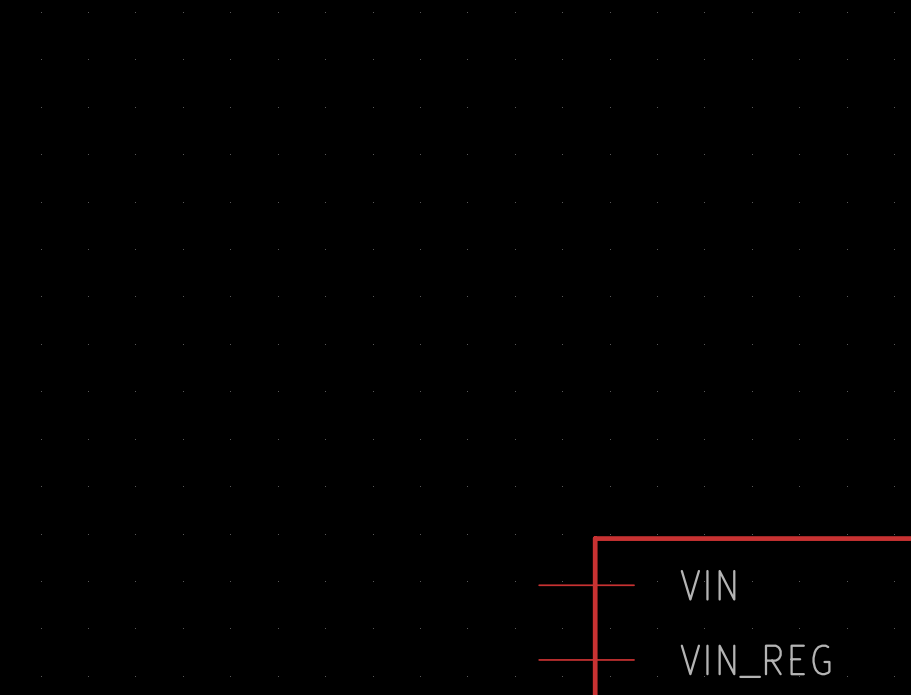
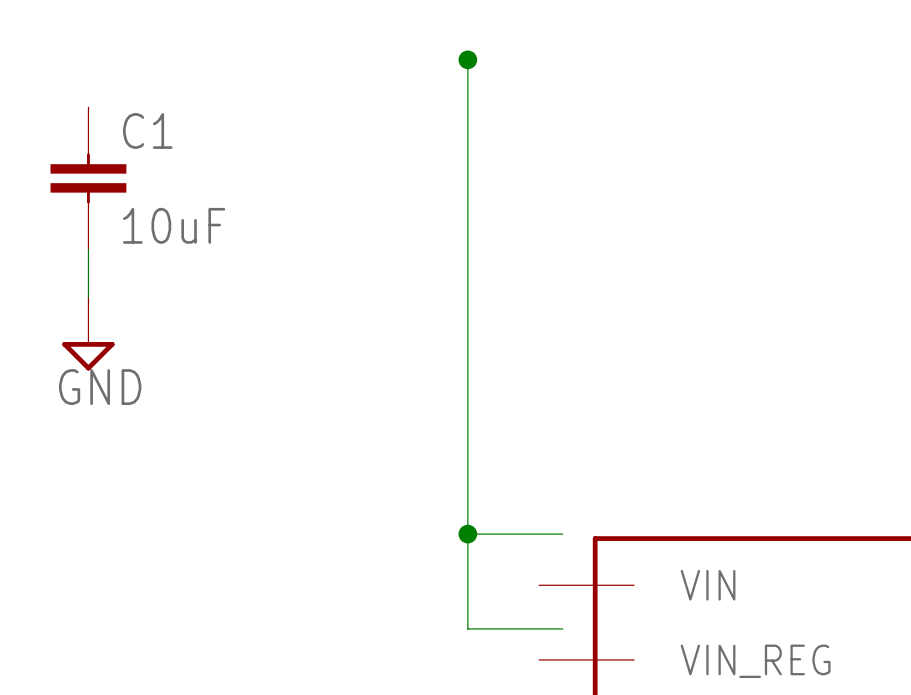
wire: none -> (467, 59) (467, 628) (562, 628)
junction: none -> (467, 59)
C1: none -> 10uF (88, 178)
wire: none -> (88, 249) (88, 296)
power symbol: none -> GND (88, 333)
wire: none -> (467, 534) (562, 534)
junction: none -> (467, 534)

